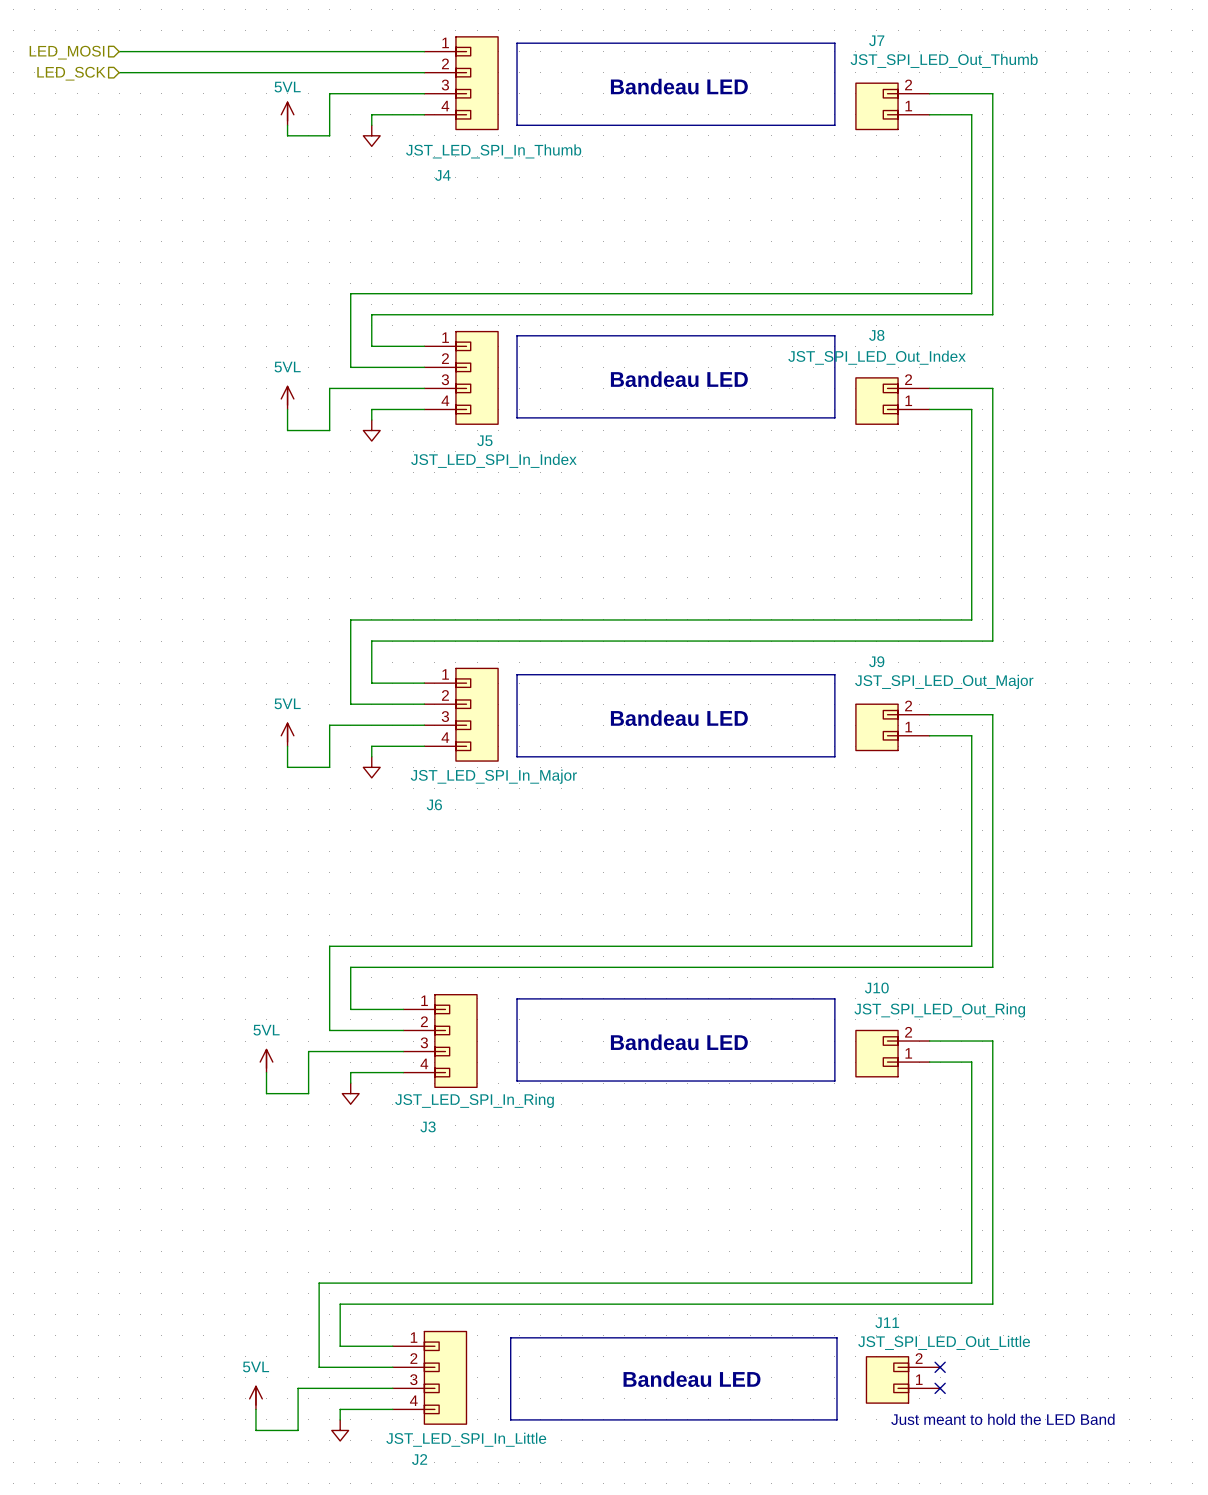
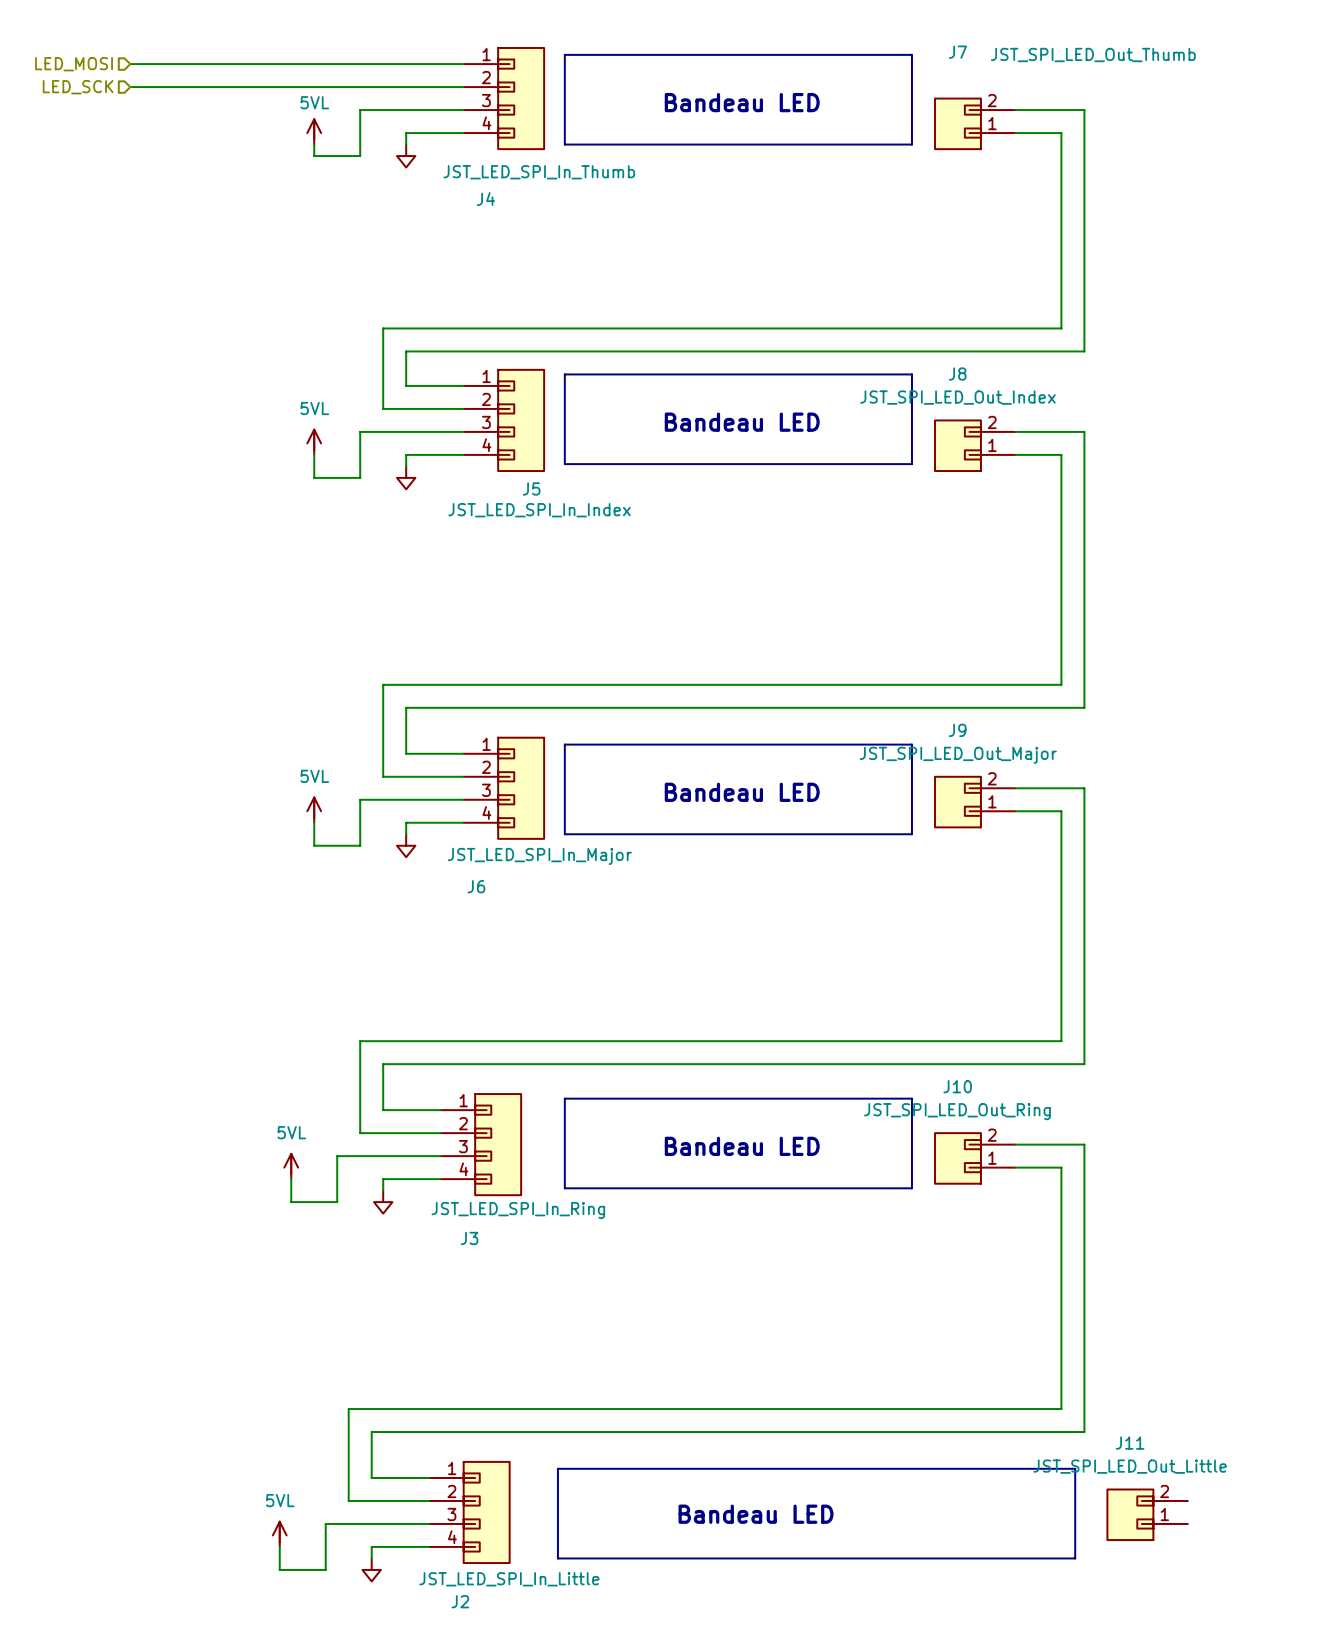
J7 value position: JST_SPI_LED_Out_Thumb (944, 60) -> JST_SPI_LED_Out_Thumb (1093, 55)
J9 value position: JST_SPI_LED_Out_Major (944, 681) -> JST_SPI_LED_Out_Major (958, 755)
J10 value position: JST_SPI_LED_Out_Ring (939, 1010) -> JST_SPI_LED_Out_Ring (957, 1111)
J11 name position: J11 (887, 1322) -> J11 (1130, 1443)
line: (836, 1337) (836, 1419) -> (914, 1468) (1075, 1468) (1075, 1558) (914, 1558)
J11 value position: JST_SPI_LED_Out_Little (944, 1342) -> JST_SPI_LED_Out_Little (1130, 1466)
no-connect mark: (940, 1367) -> none
J11 position: (903, 1379) -> (1147, 1514)
no-connect mark: (940, 1388) -> none
text: Just meant to hold the LED Band (1002, 1419) -> none

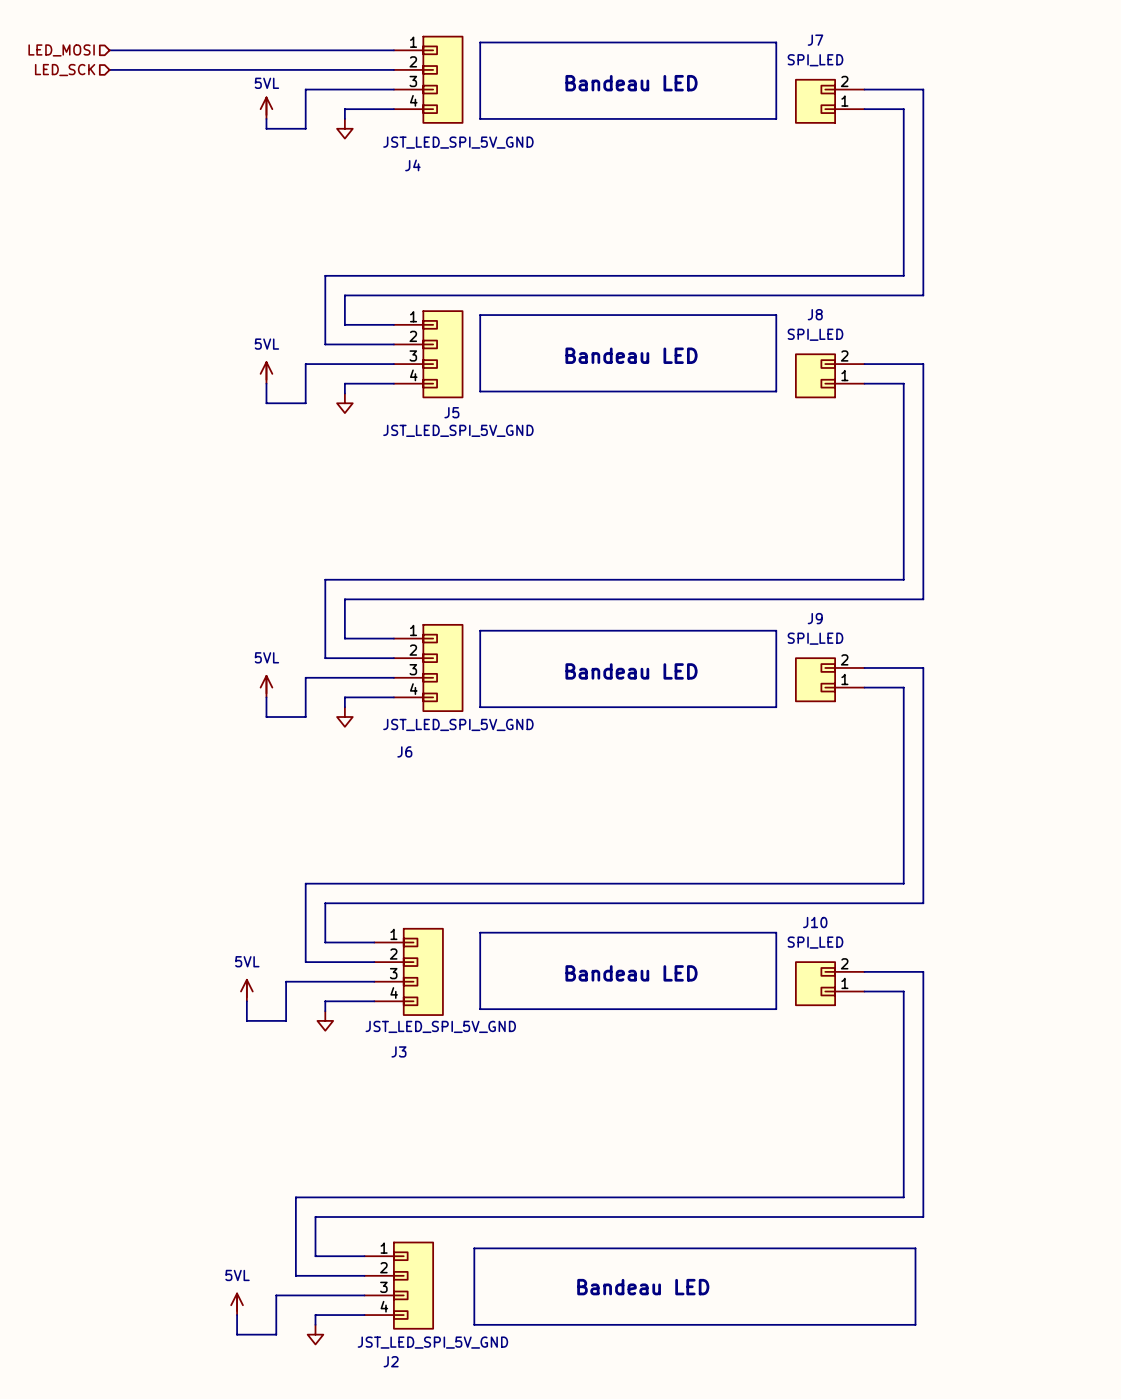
J7 value: JST_SPI_LED_Out_Thumb (1093, 55) -> SPI_LED (815, 60)
J4 value: JST_LED_SPI_In_Thumb (539, 172) -> JST_LED_SPI_5V_GND (458, 142)
J8 value: JST_SPI_LED_Out_Index (957, 397) -> SPI_LED (815, 334)
J5 value: JST_LED_SPI_In_Index (539, 510) -> JST_LED_SPI_5V_GND (458, 430)
J9 value: JST_SPI_LED_Out_Major (958, 755) -> SPI_LED (815, 638)
J6 value: JST_LED_SPI_In_Major (539, 856) -> JST_LED_SPI_5V_GND (458, 724)
J10 value: JST_SPI_LED_Out_Ring (957, 1111) -> SPI_LED (815, 942)
J3 value: JST_LED_SPI_In_Ring (518, 1210) -> JST_LED_SPI_5V_GND (440, 1026)
J11: JST_SPI_LED_Out_Little (1147, 1514) -> none
J2 value: JST_LED_SPI_In_Little (509, 1579) -> JST_LED_SPI_5V_GND (432, 1342)

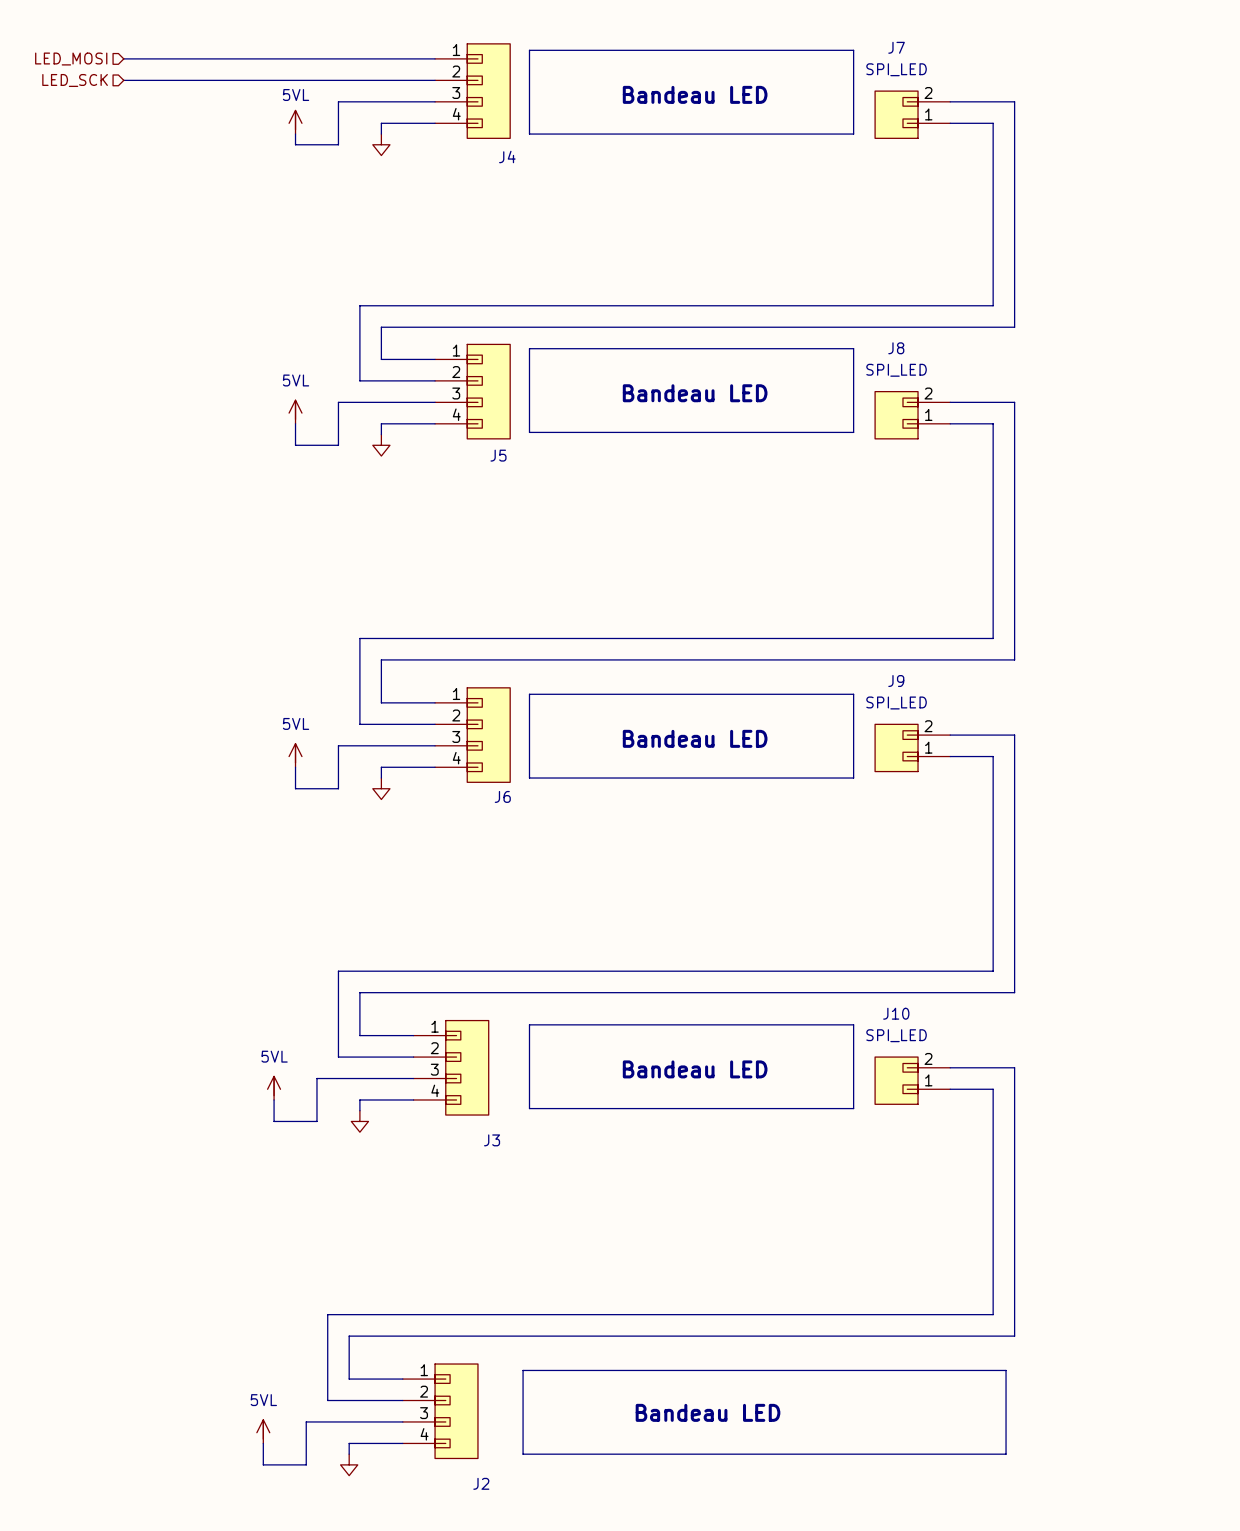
J4 value: JST_LED_SPI_5V_GND (458, 142) -> none
J4 name position: J4 (412, 165) -> J4 (507, 156)
J5 value: JST_LED_SPI_5V_GND (458, 430) -> none
J6 value: JST_LED_SPI_5V_GND (458, 724) -> none
J6 name position: J6 (404, 751) -> J6 (502, 796)
J3 value: JST_LED_SPI_5V_GND (440, 1026) -> none
J3 name position: J3 (398, 1051) -> J3 (492, 1140)
J2 value: JST_LED_SPI_5V_GND (432, 1342) -> none
J2 name position: J2 (391, 1361) -> J2 (481, 1483)

